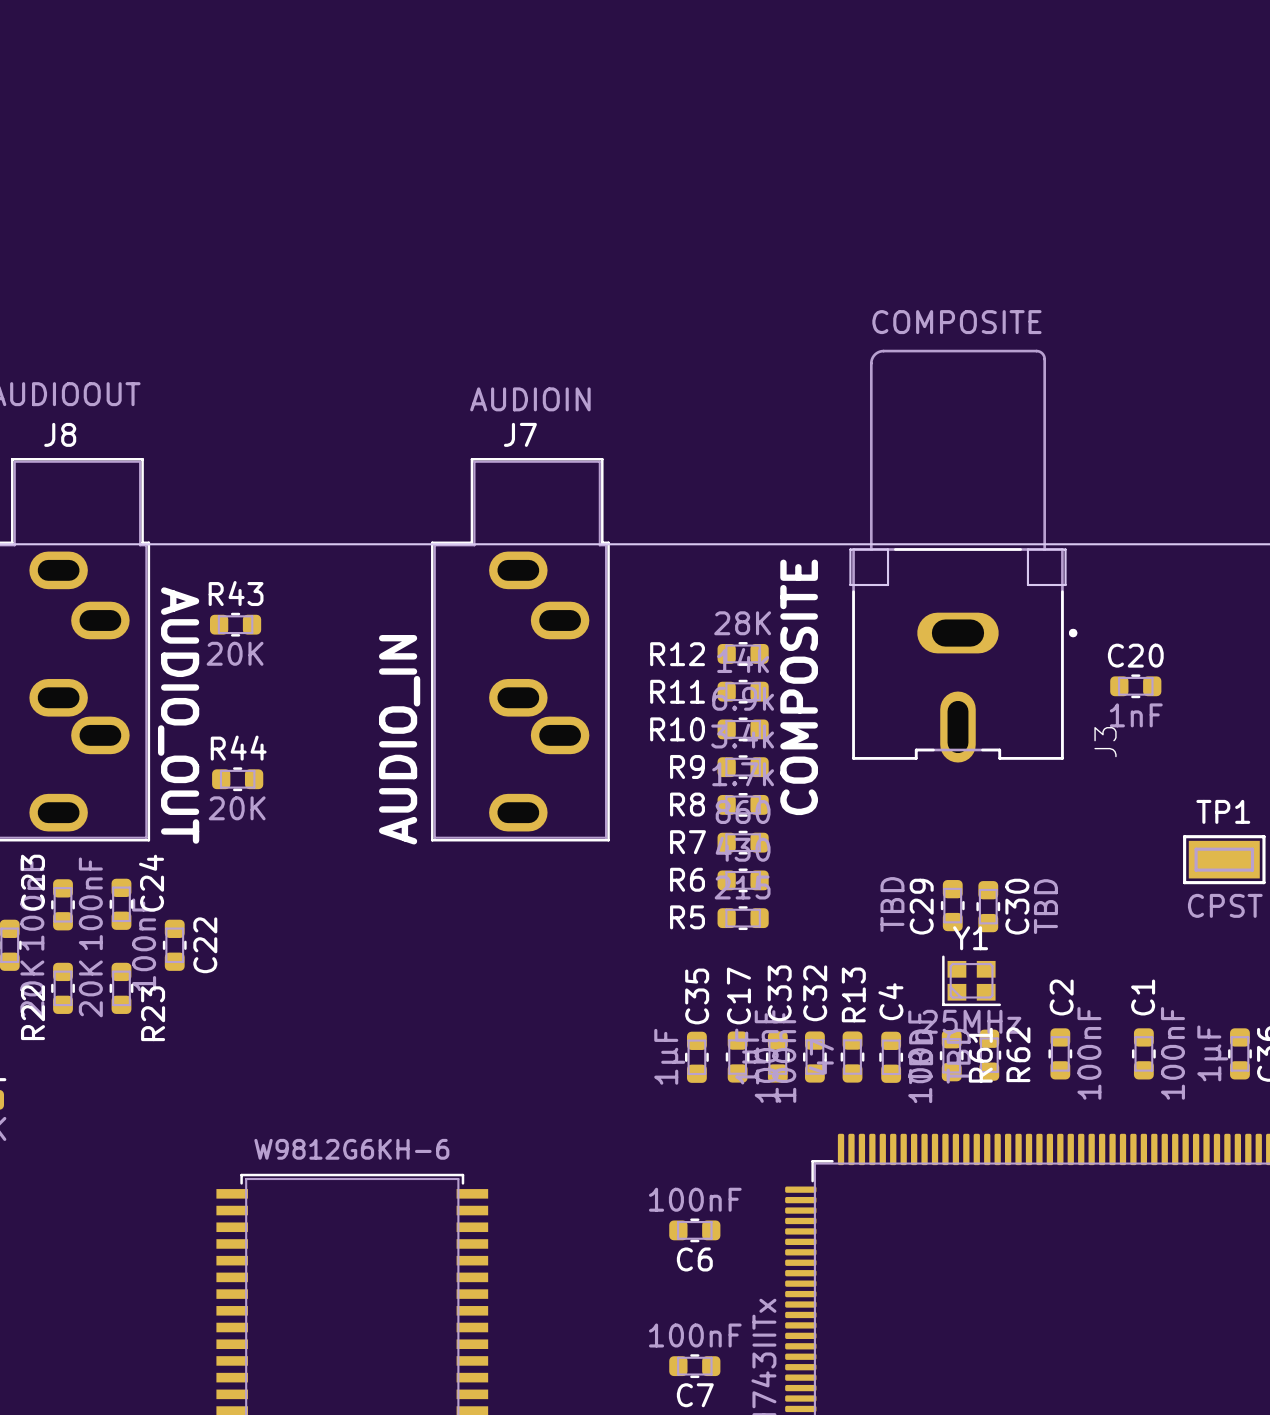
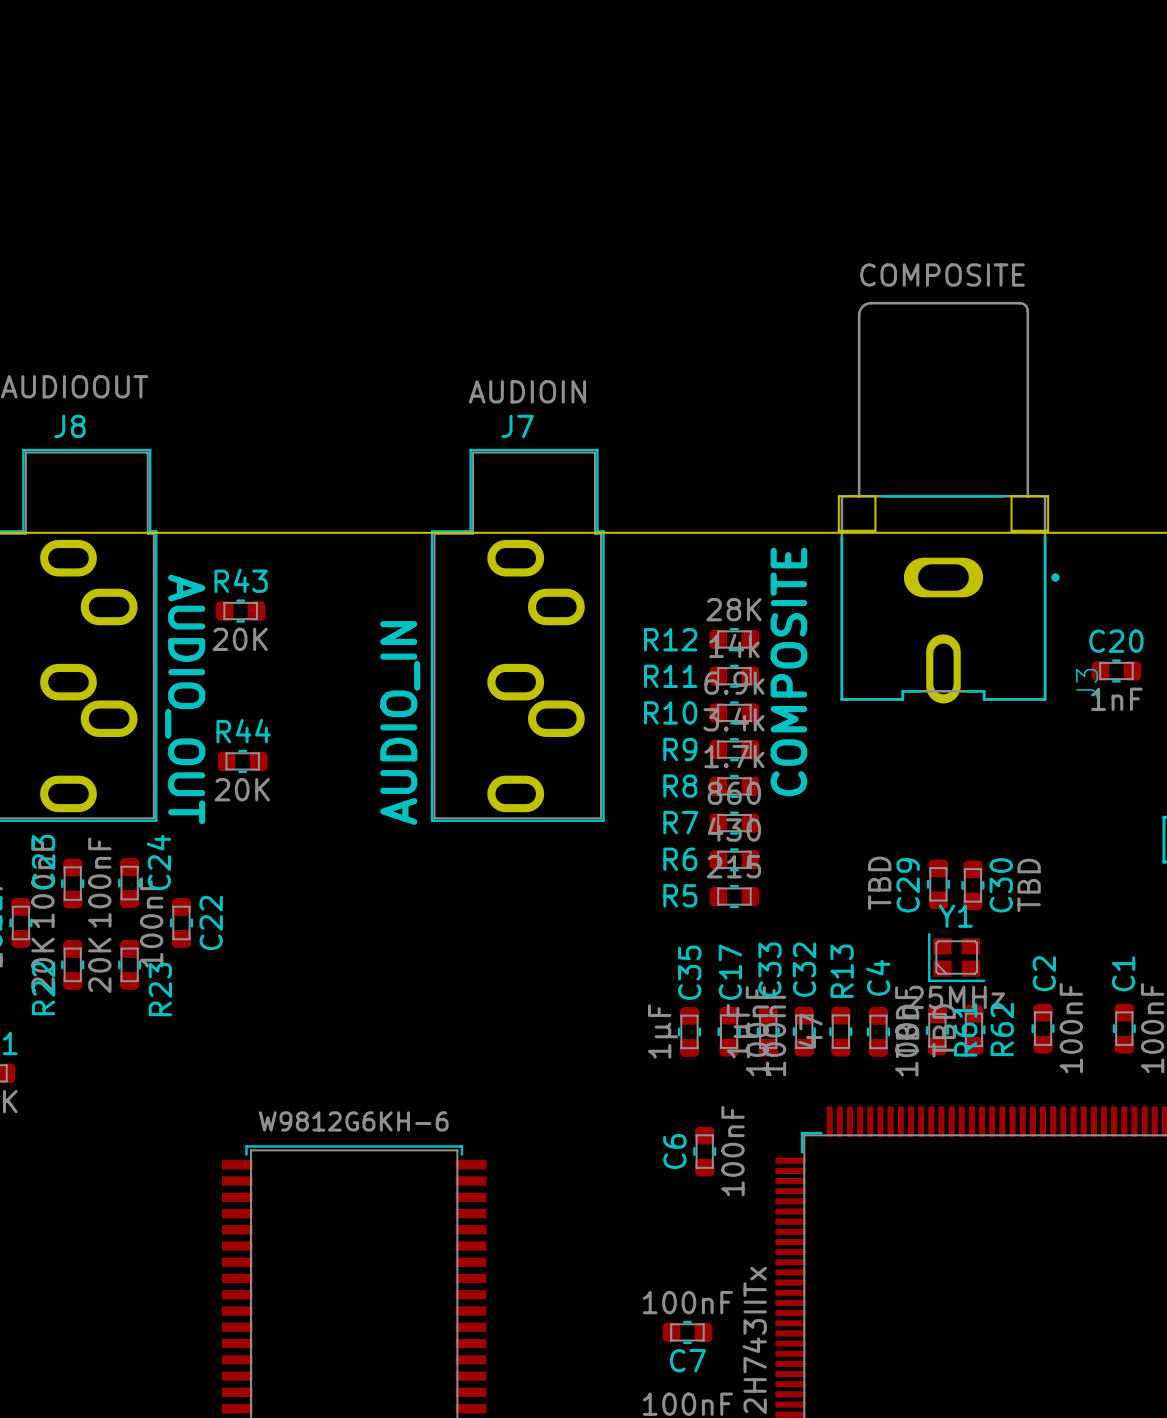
J3 position: (963, 556) -> (948, 502)
C6 rotation: 0° (694, 1230) -> 90° clockwise (704, 1151)
C6 position: (694, 1230) -> (704, 1151)

